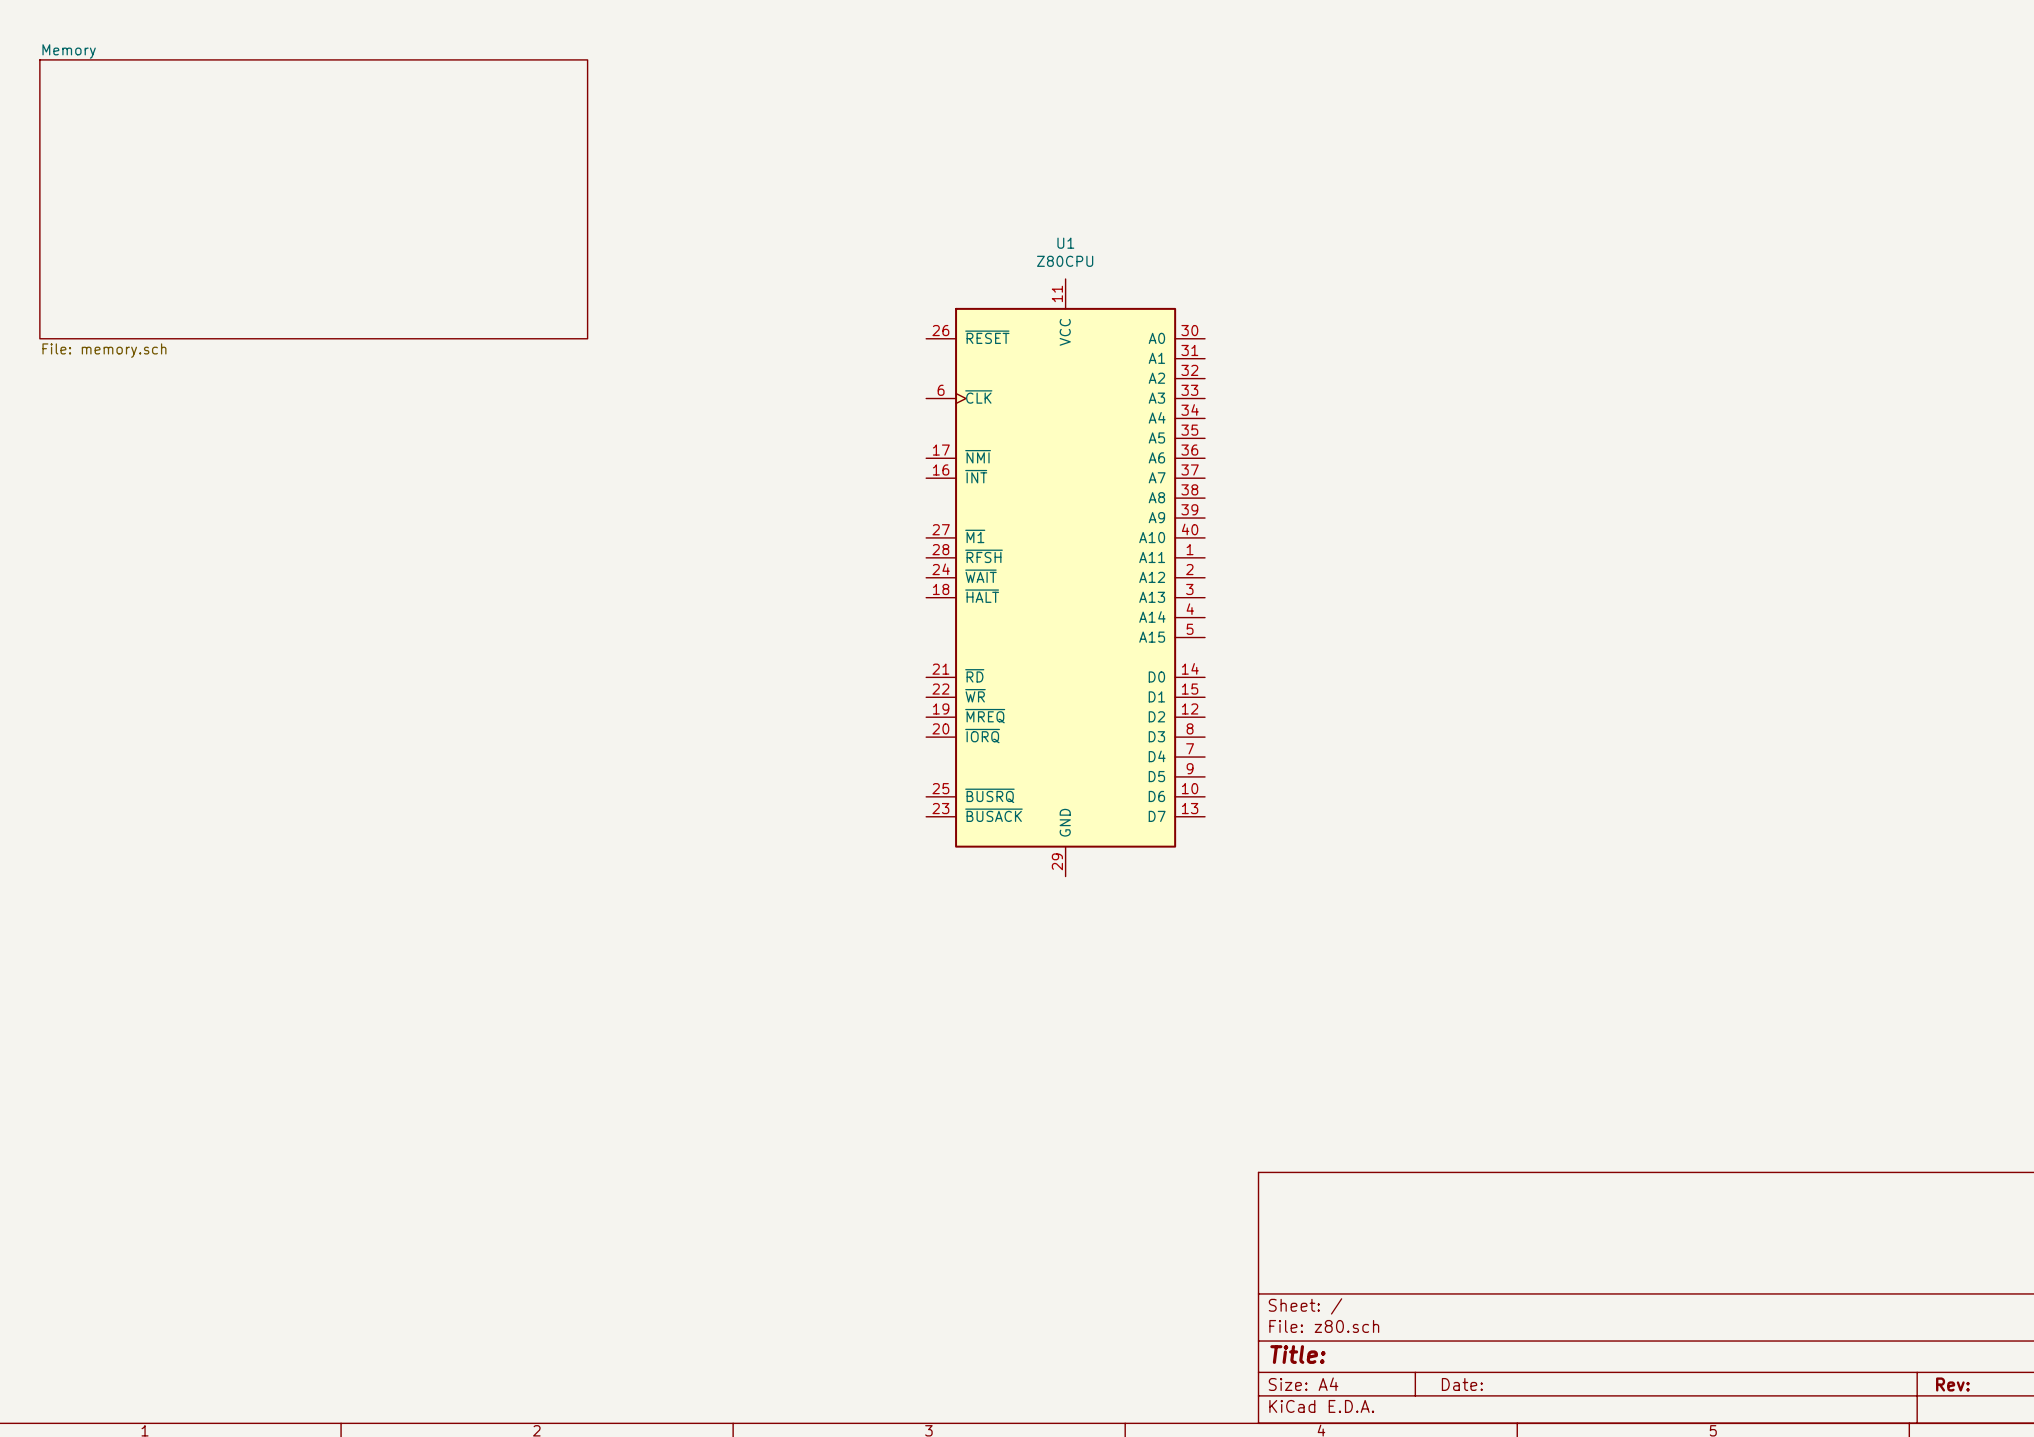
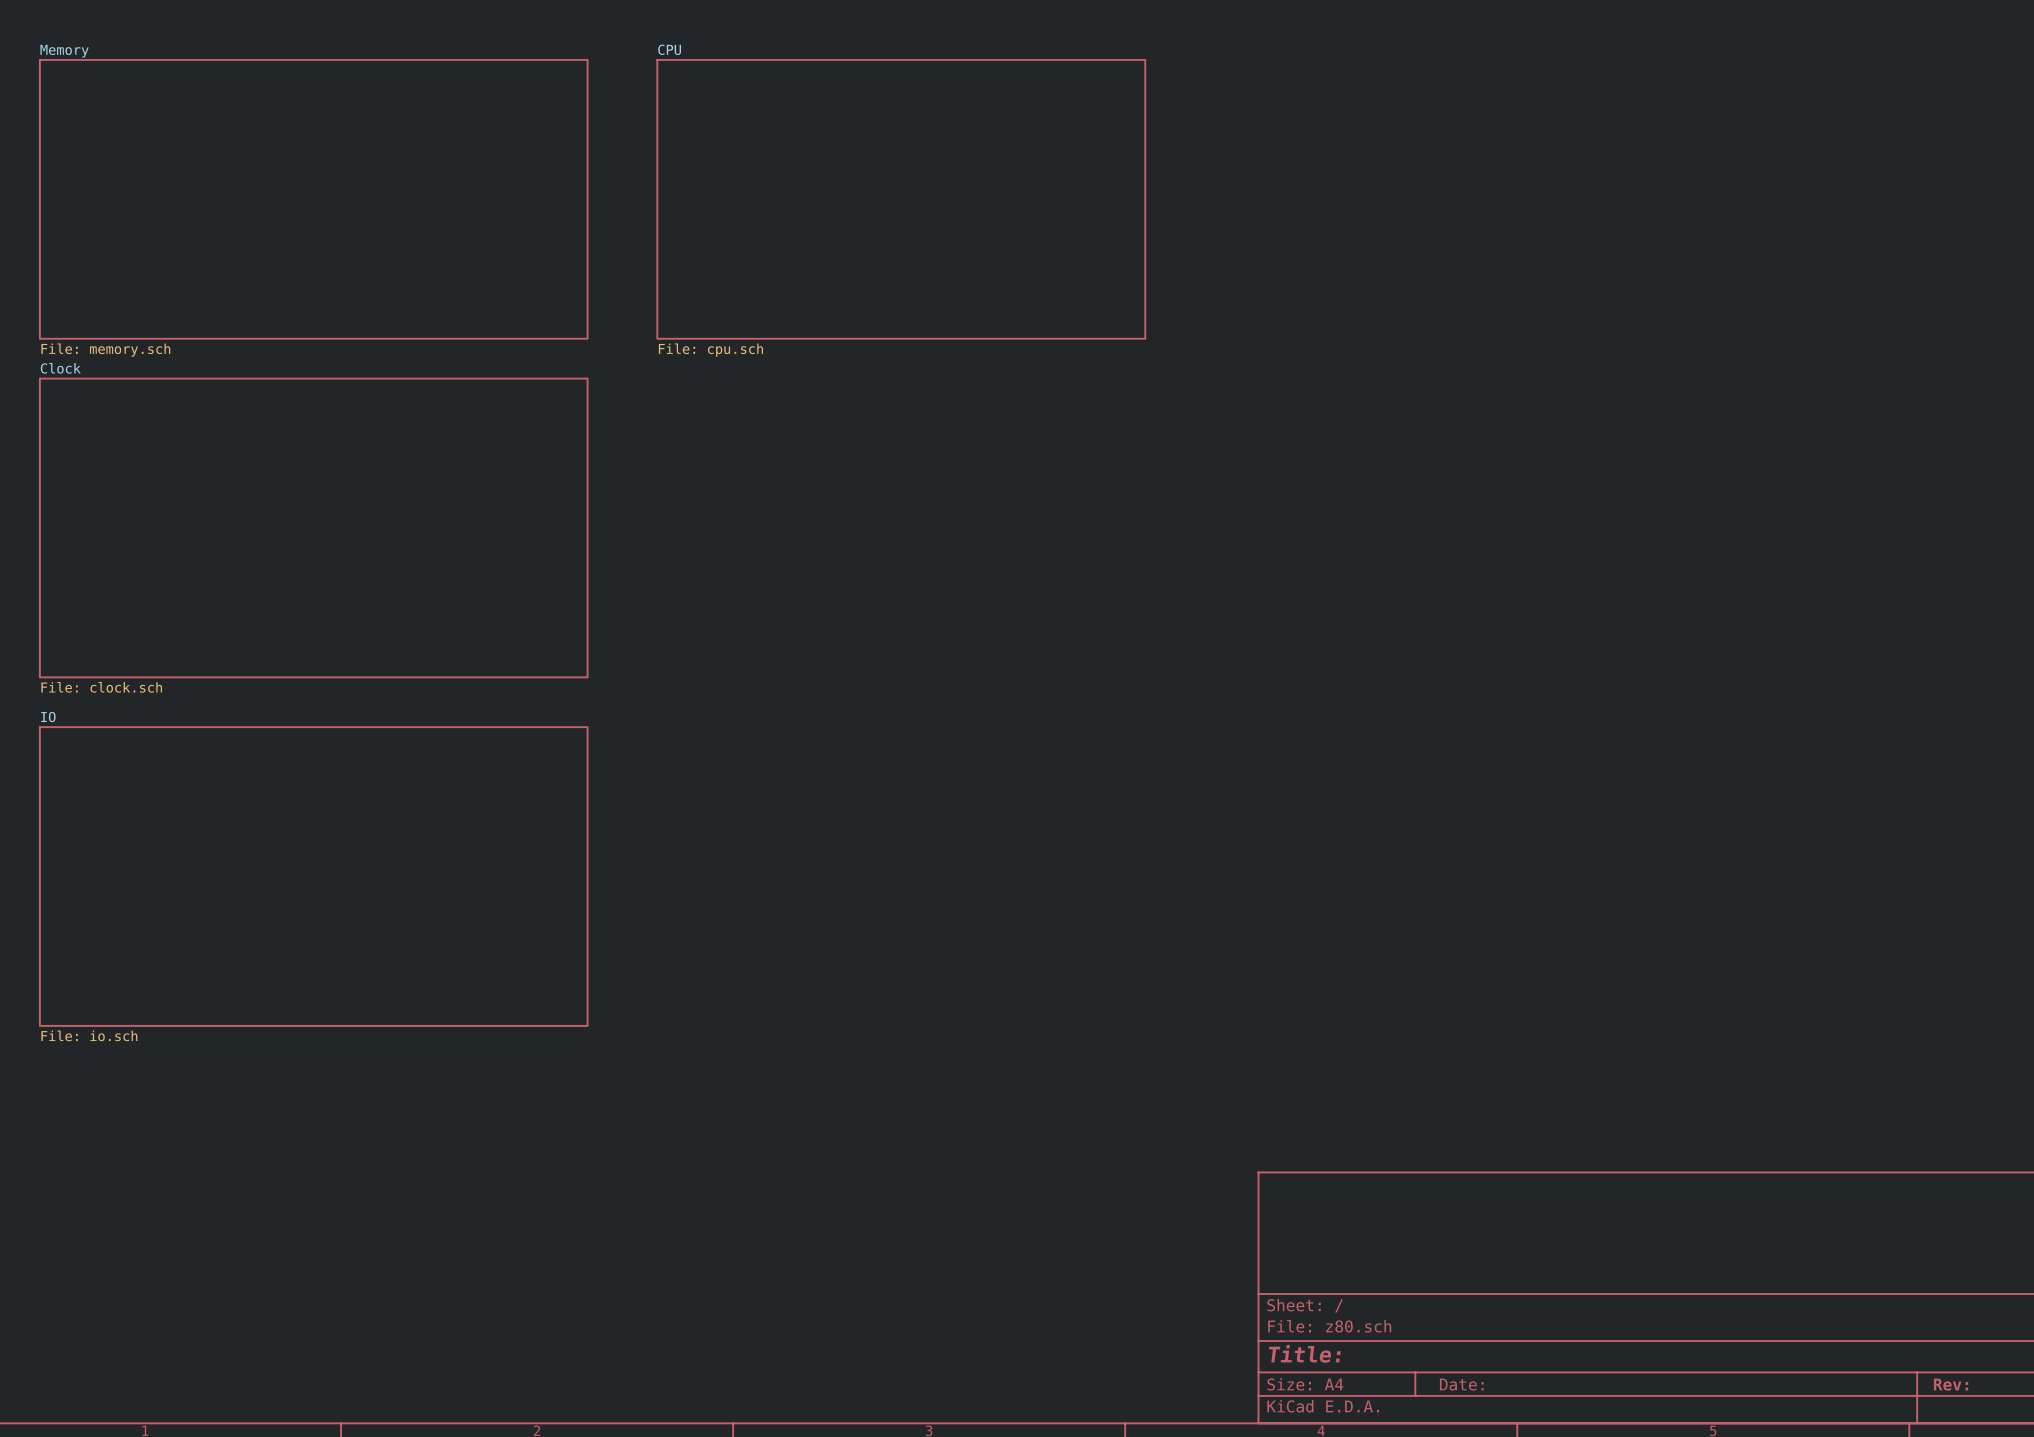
sheet CPU: none -> File: cpu.sch (901, 199)
sheet Clock: none -> File: clock.sch (313, 527)
U1: Z80CPU (1065, 577) -> none
sheet IO: none -> File: io.sch (313, 876)

